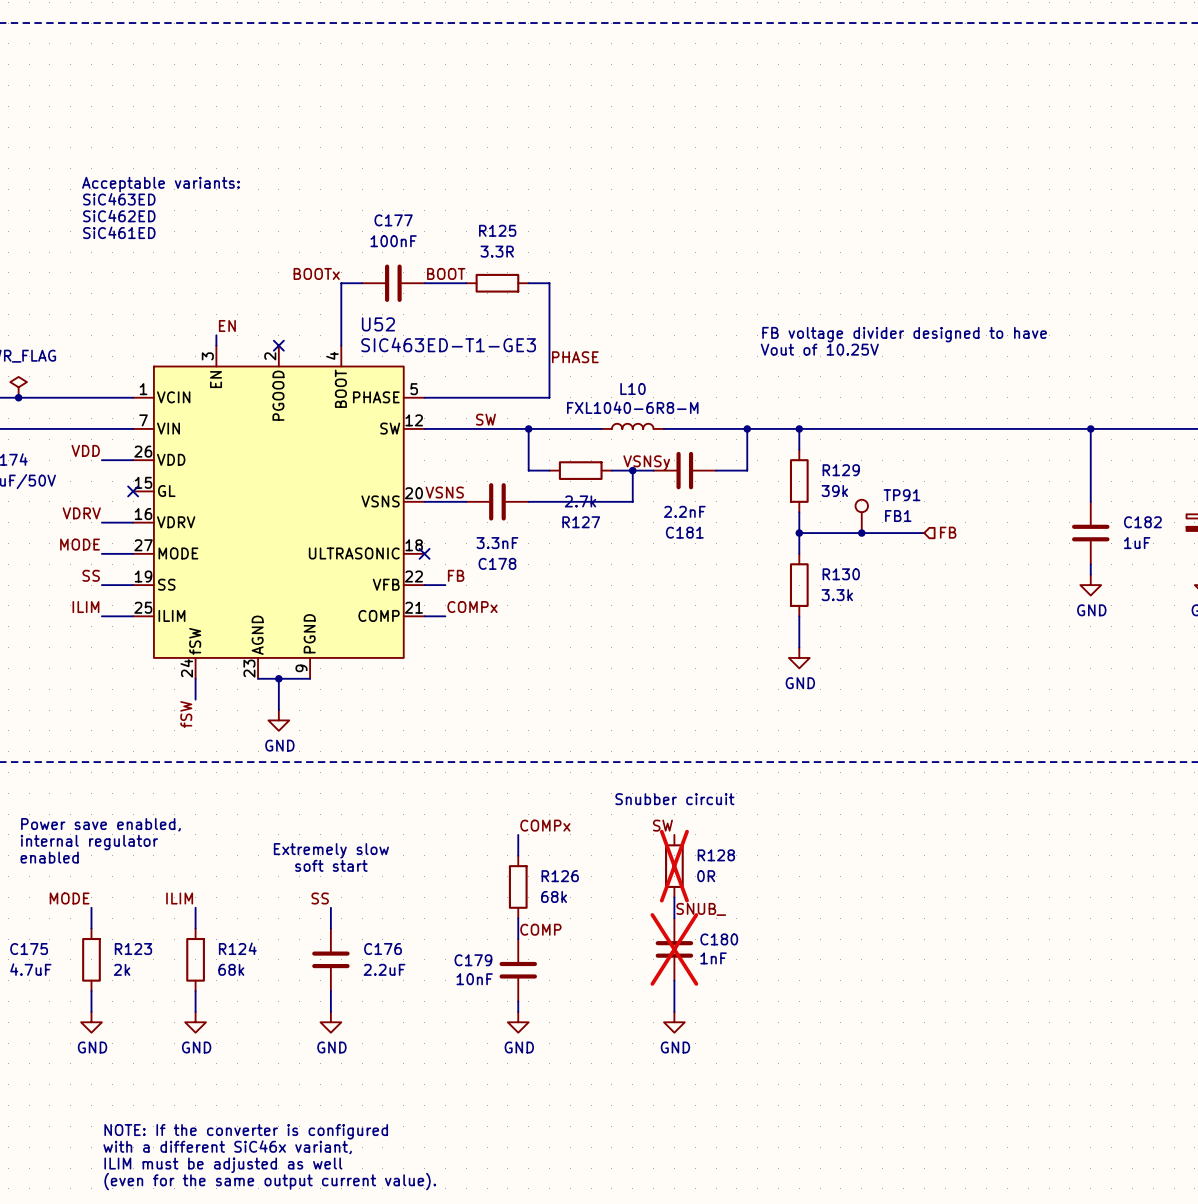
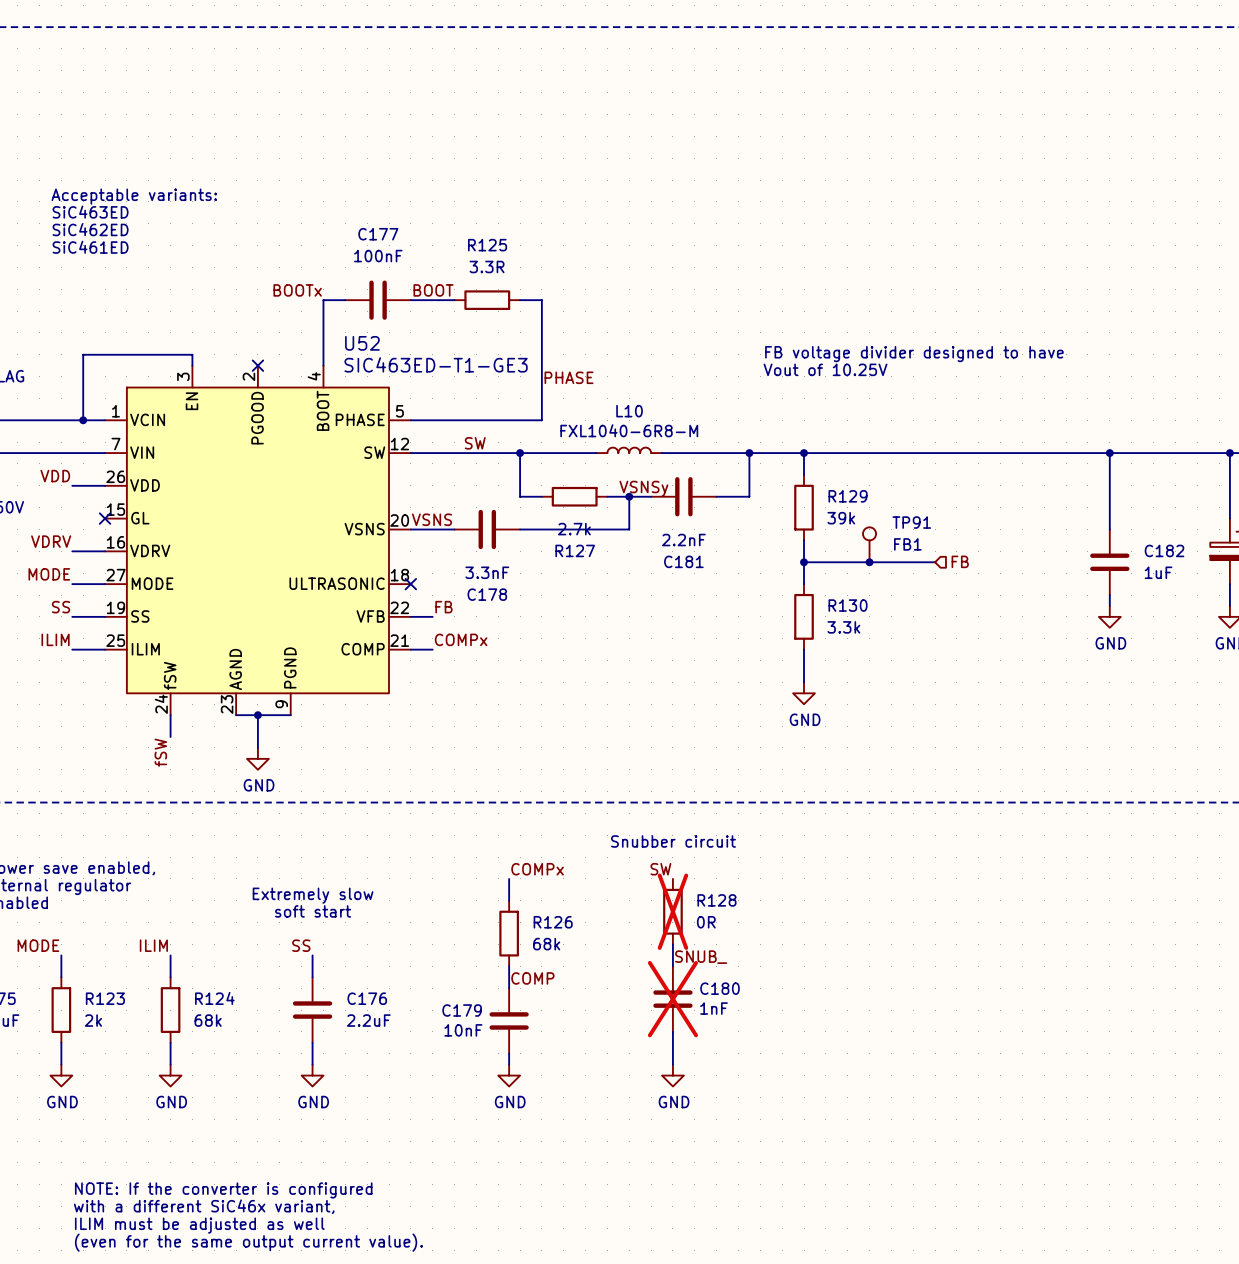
label: EN (227, 325) -> none
wire: none -> (192, 354) (83, 354) (83, 420)
junction: none -> (83, 420)

